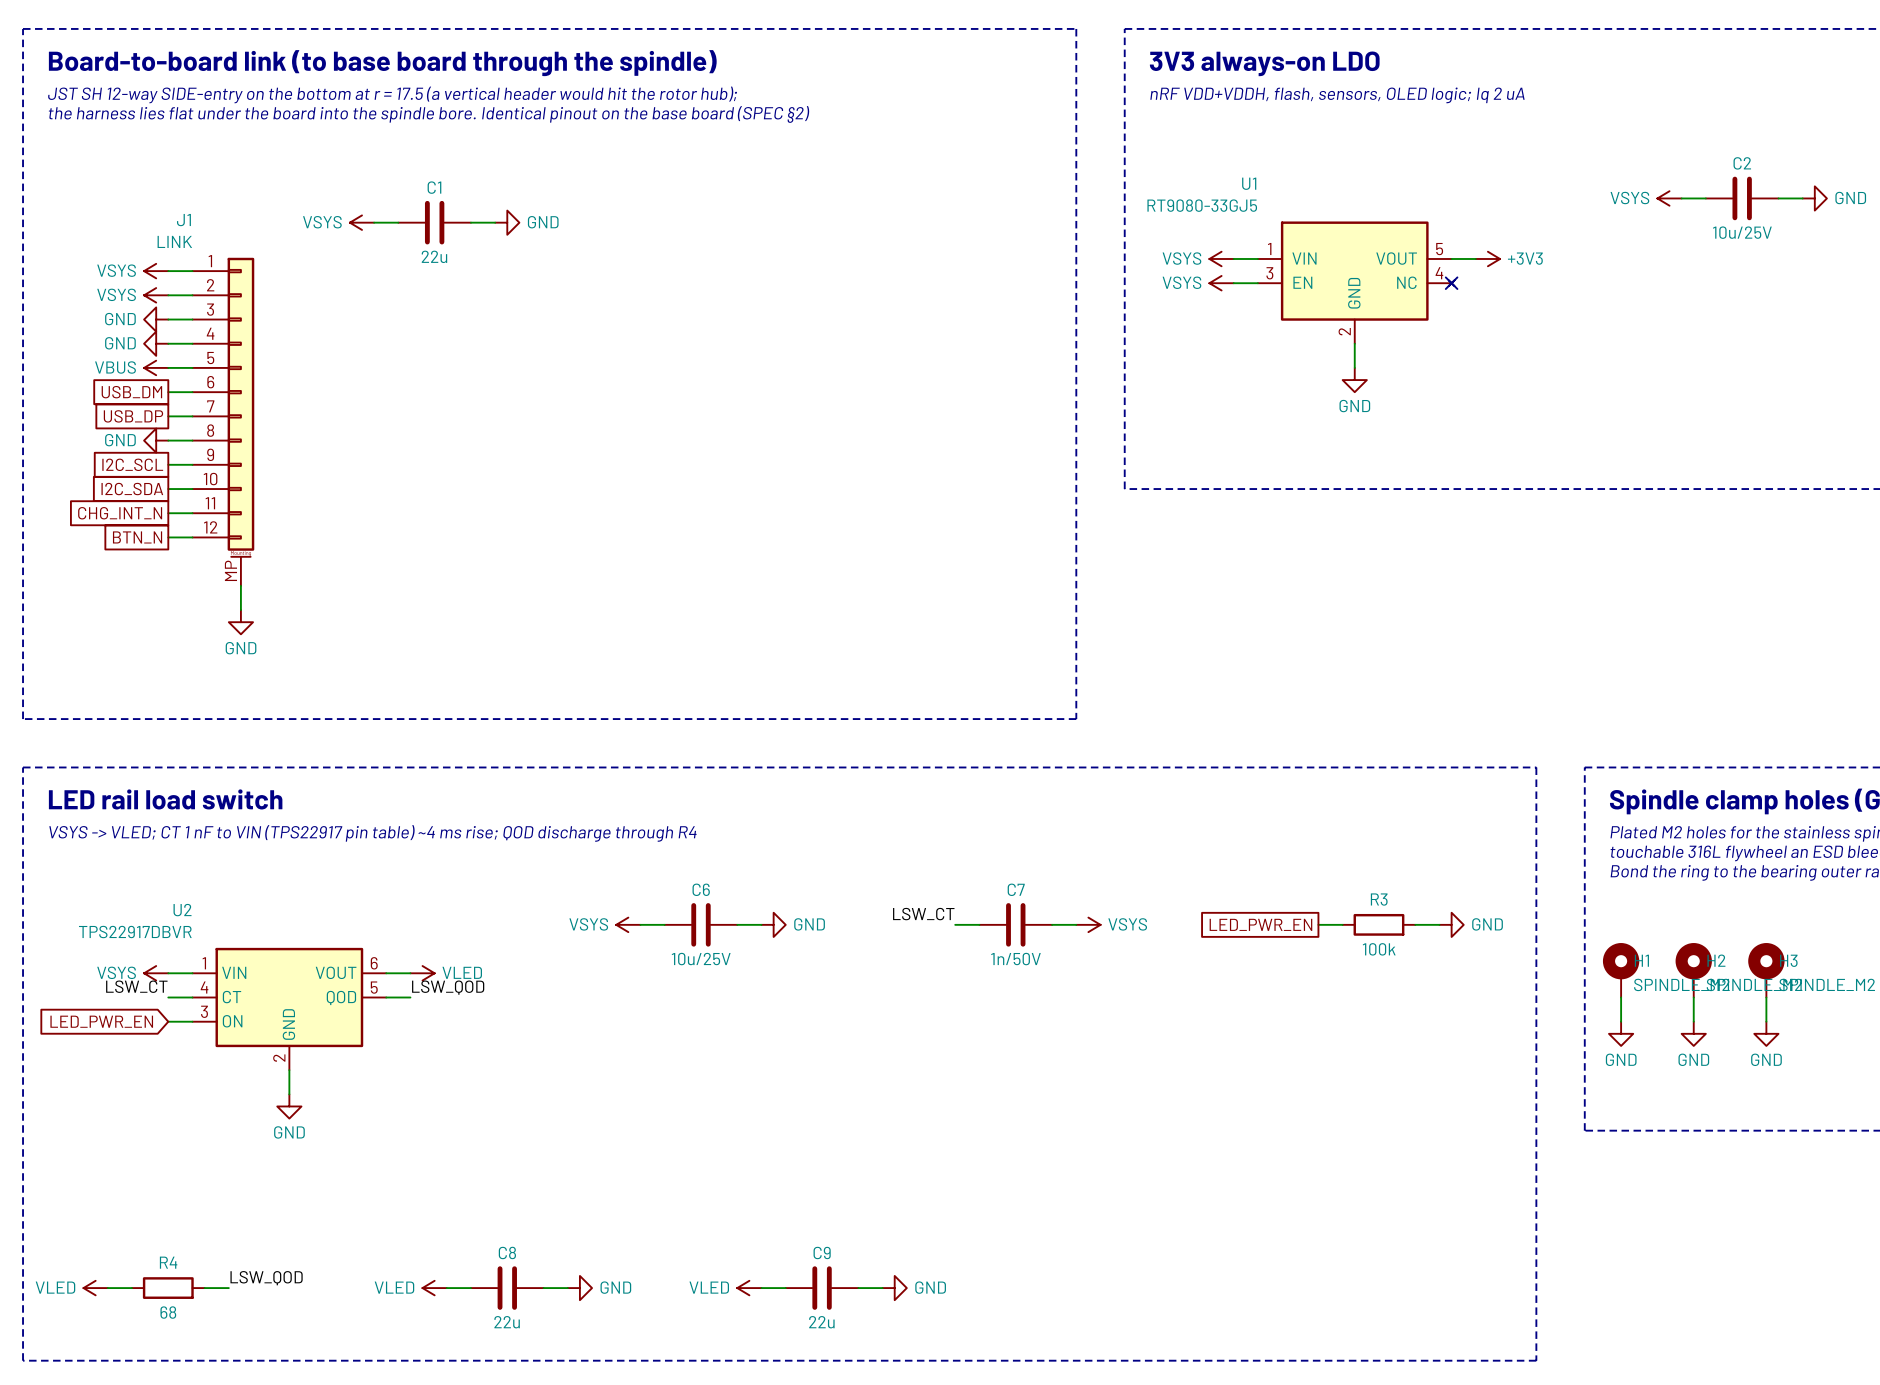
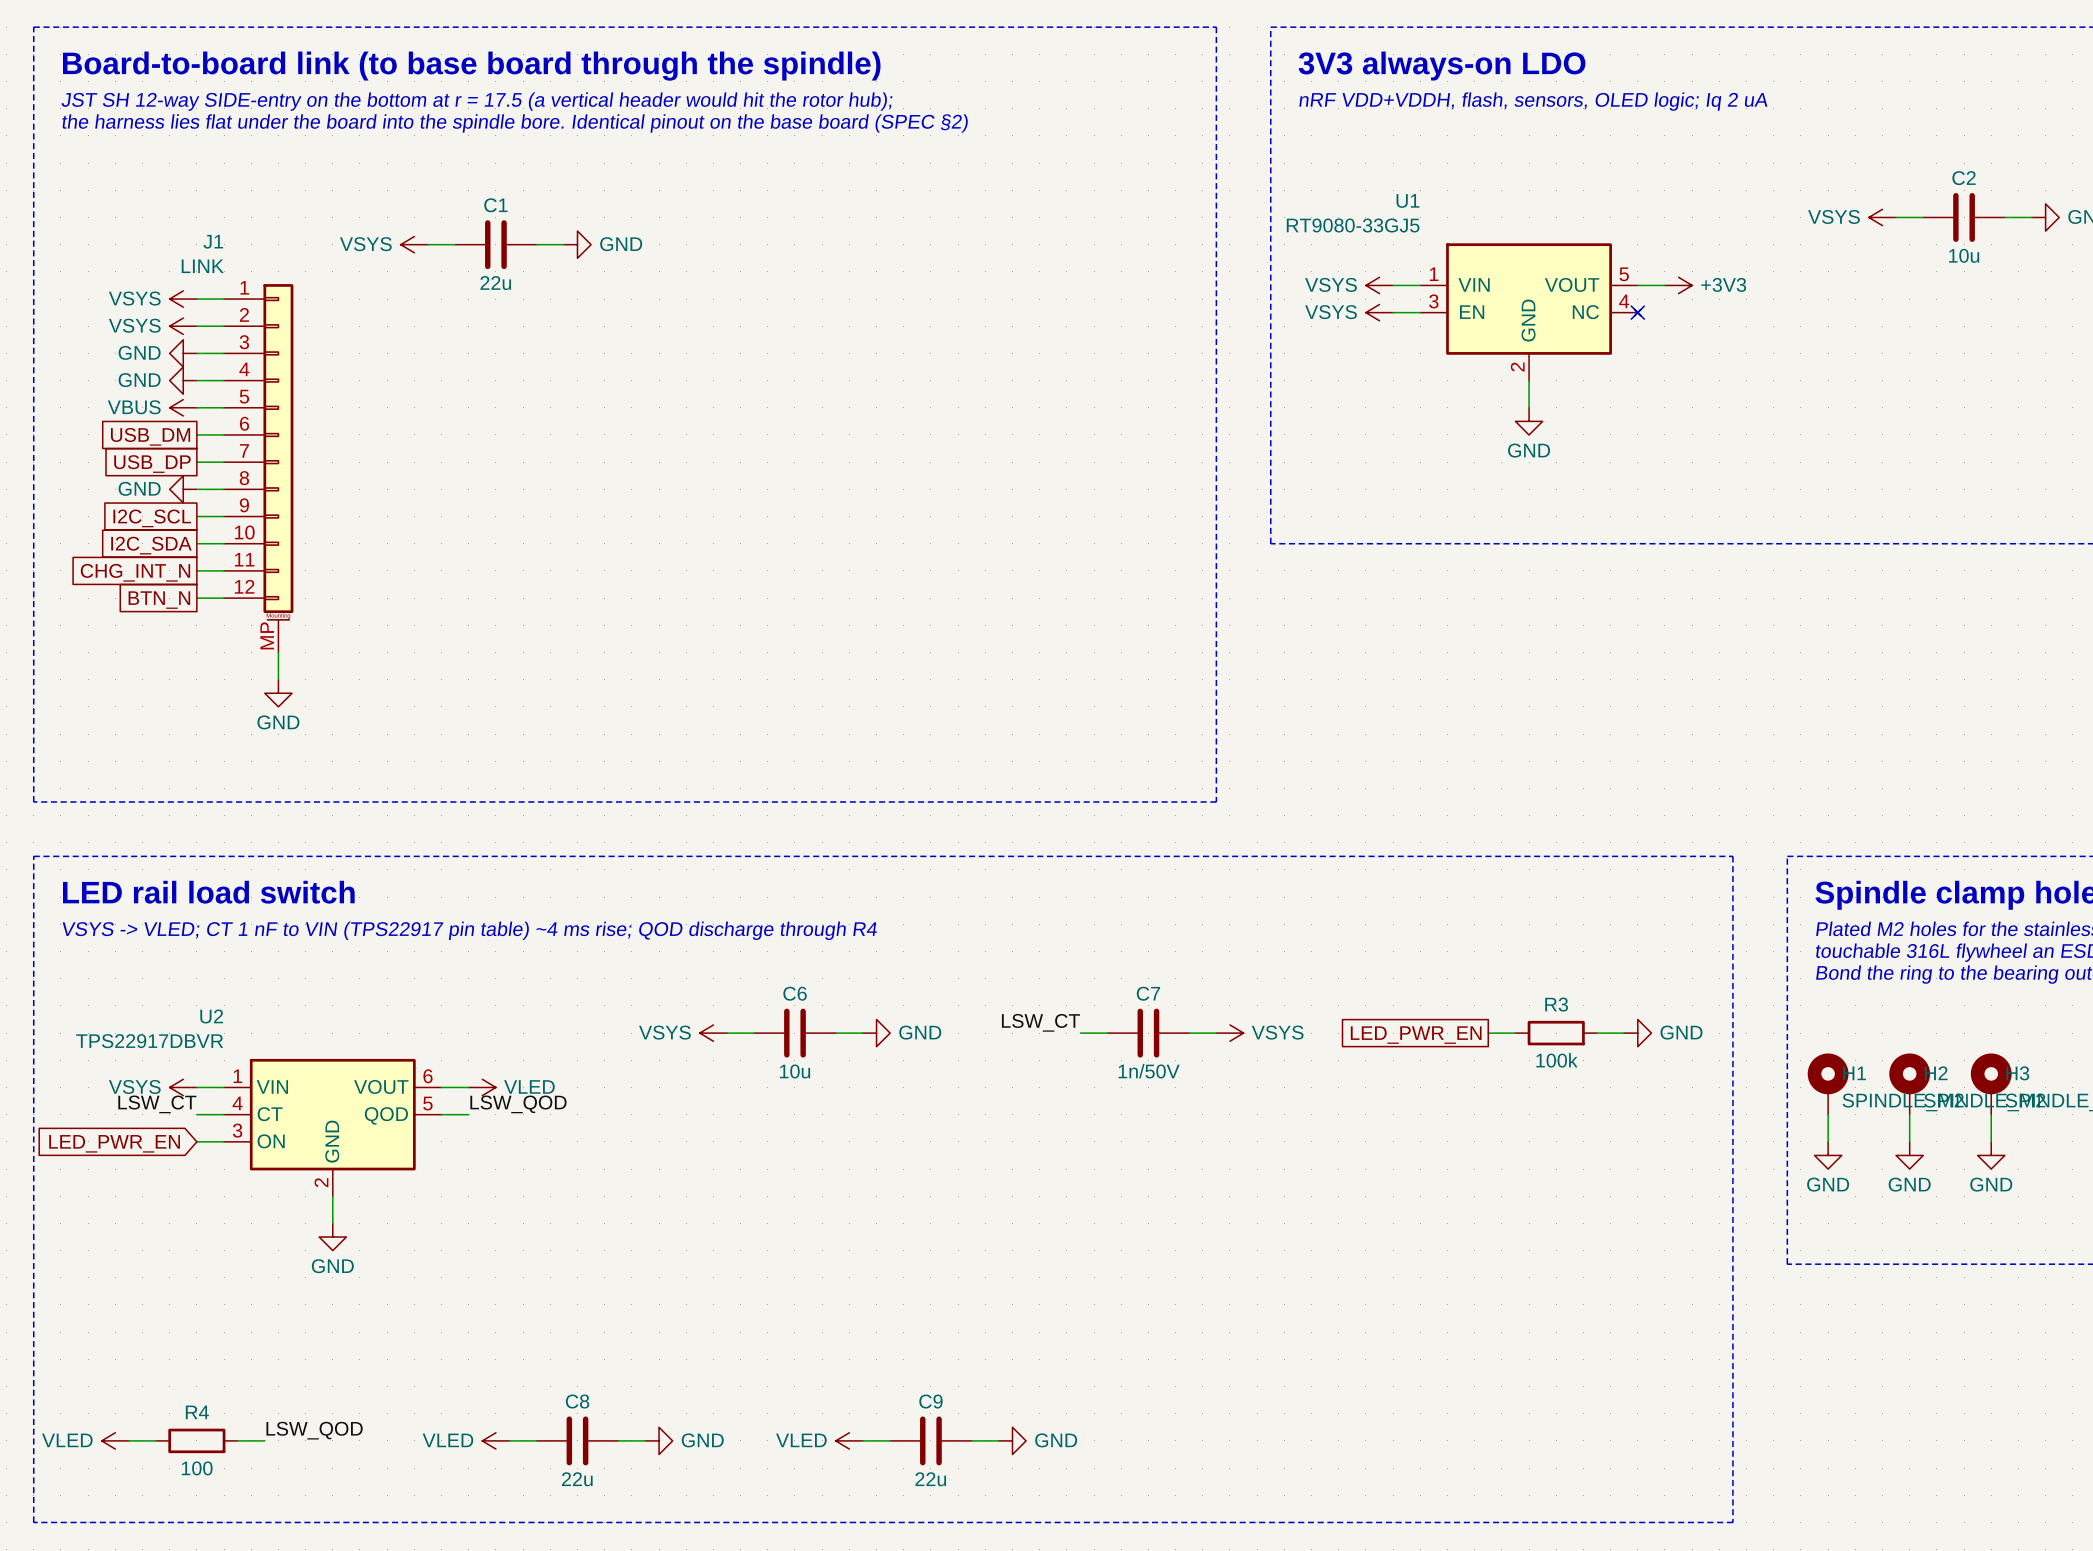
C2 value: 10u/25V (1742, 232) -> 10u (1964, 255)
C6 value: 10u/25V (701, 959) -> 10u (795, 1071)
R4 value: 68 (168, 1312) -> 100 (197, 1468)

